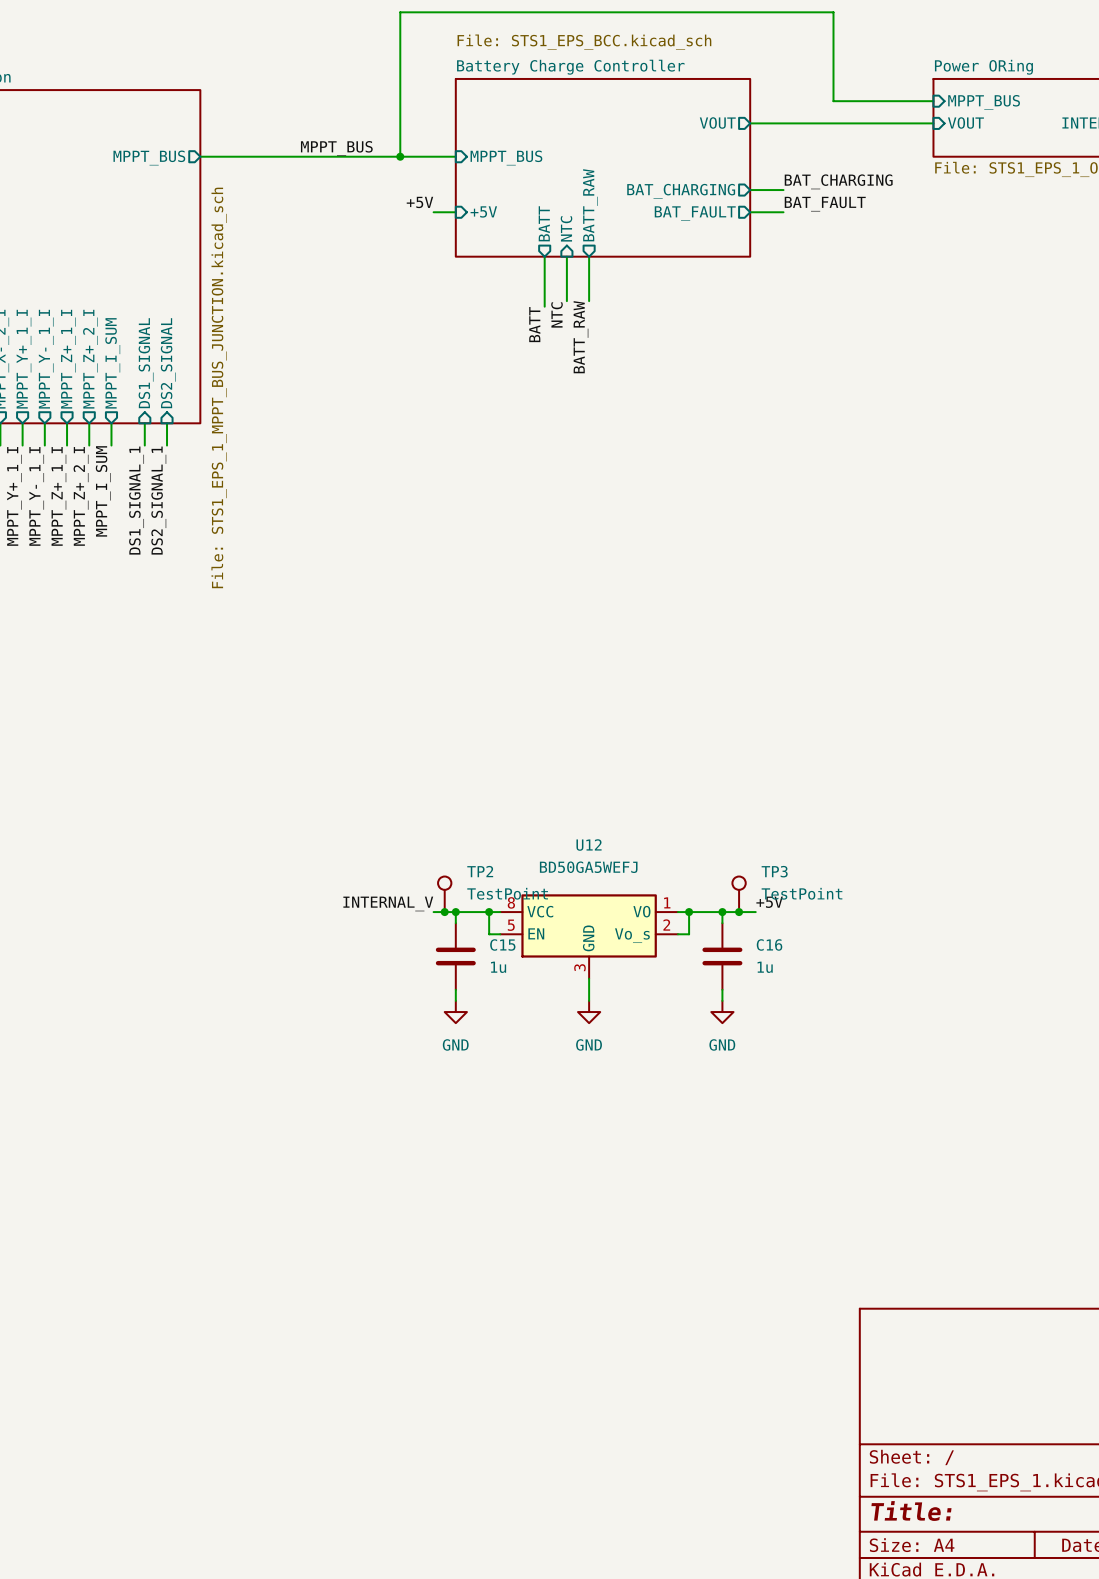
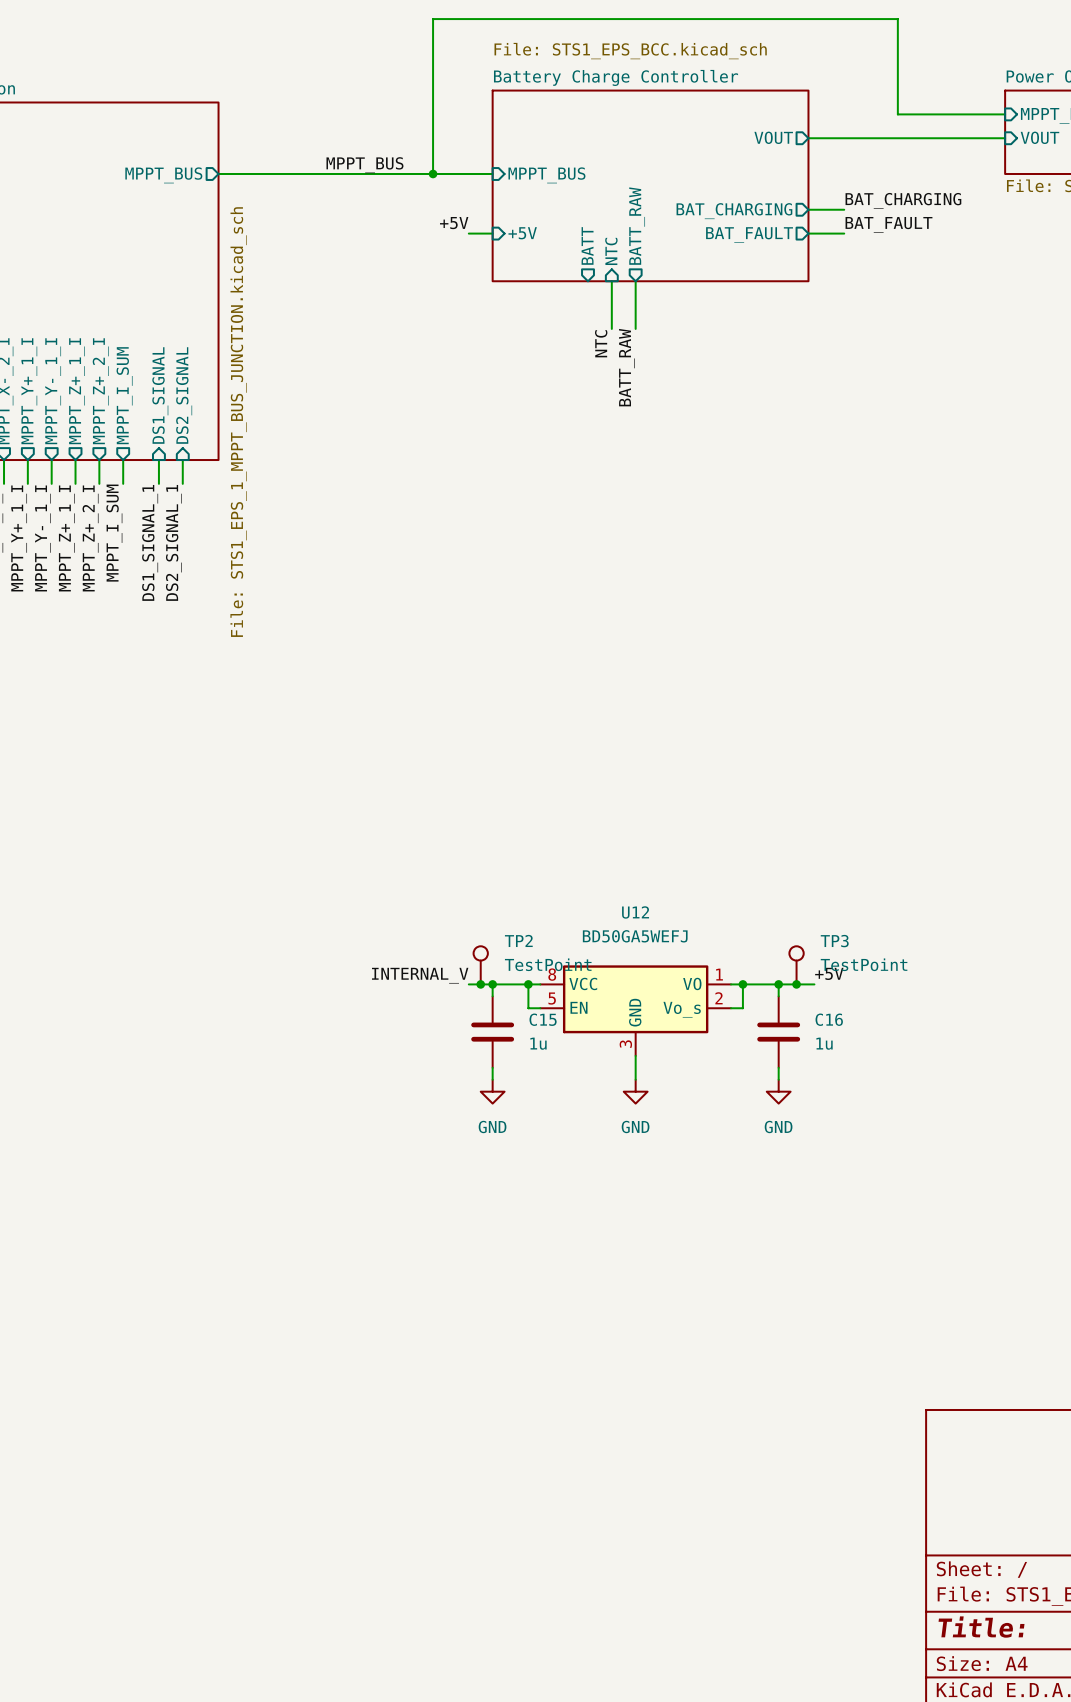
wire: (544, 256) (544, 306) -> none
label: BATT (534, 324) -> none

